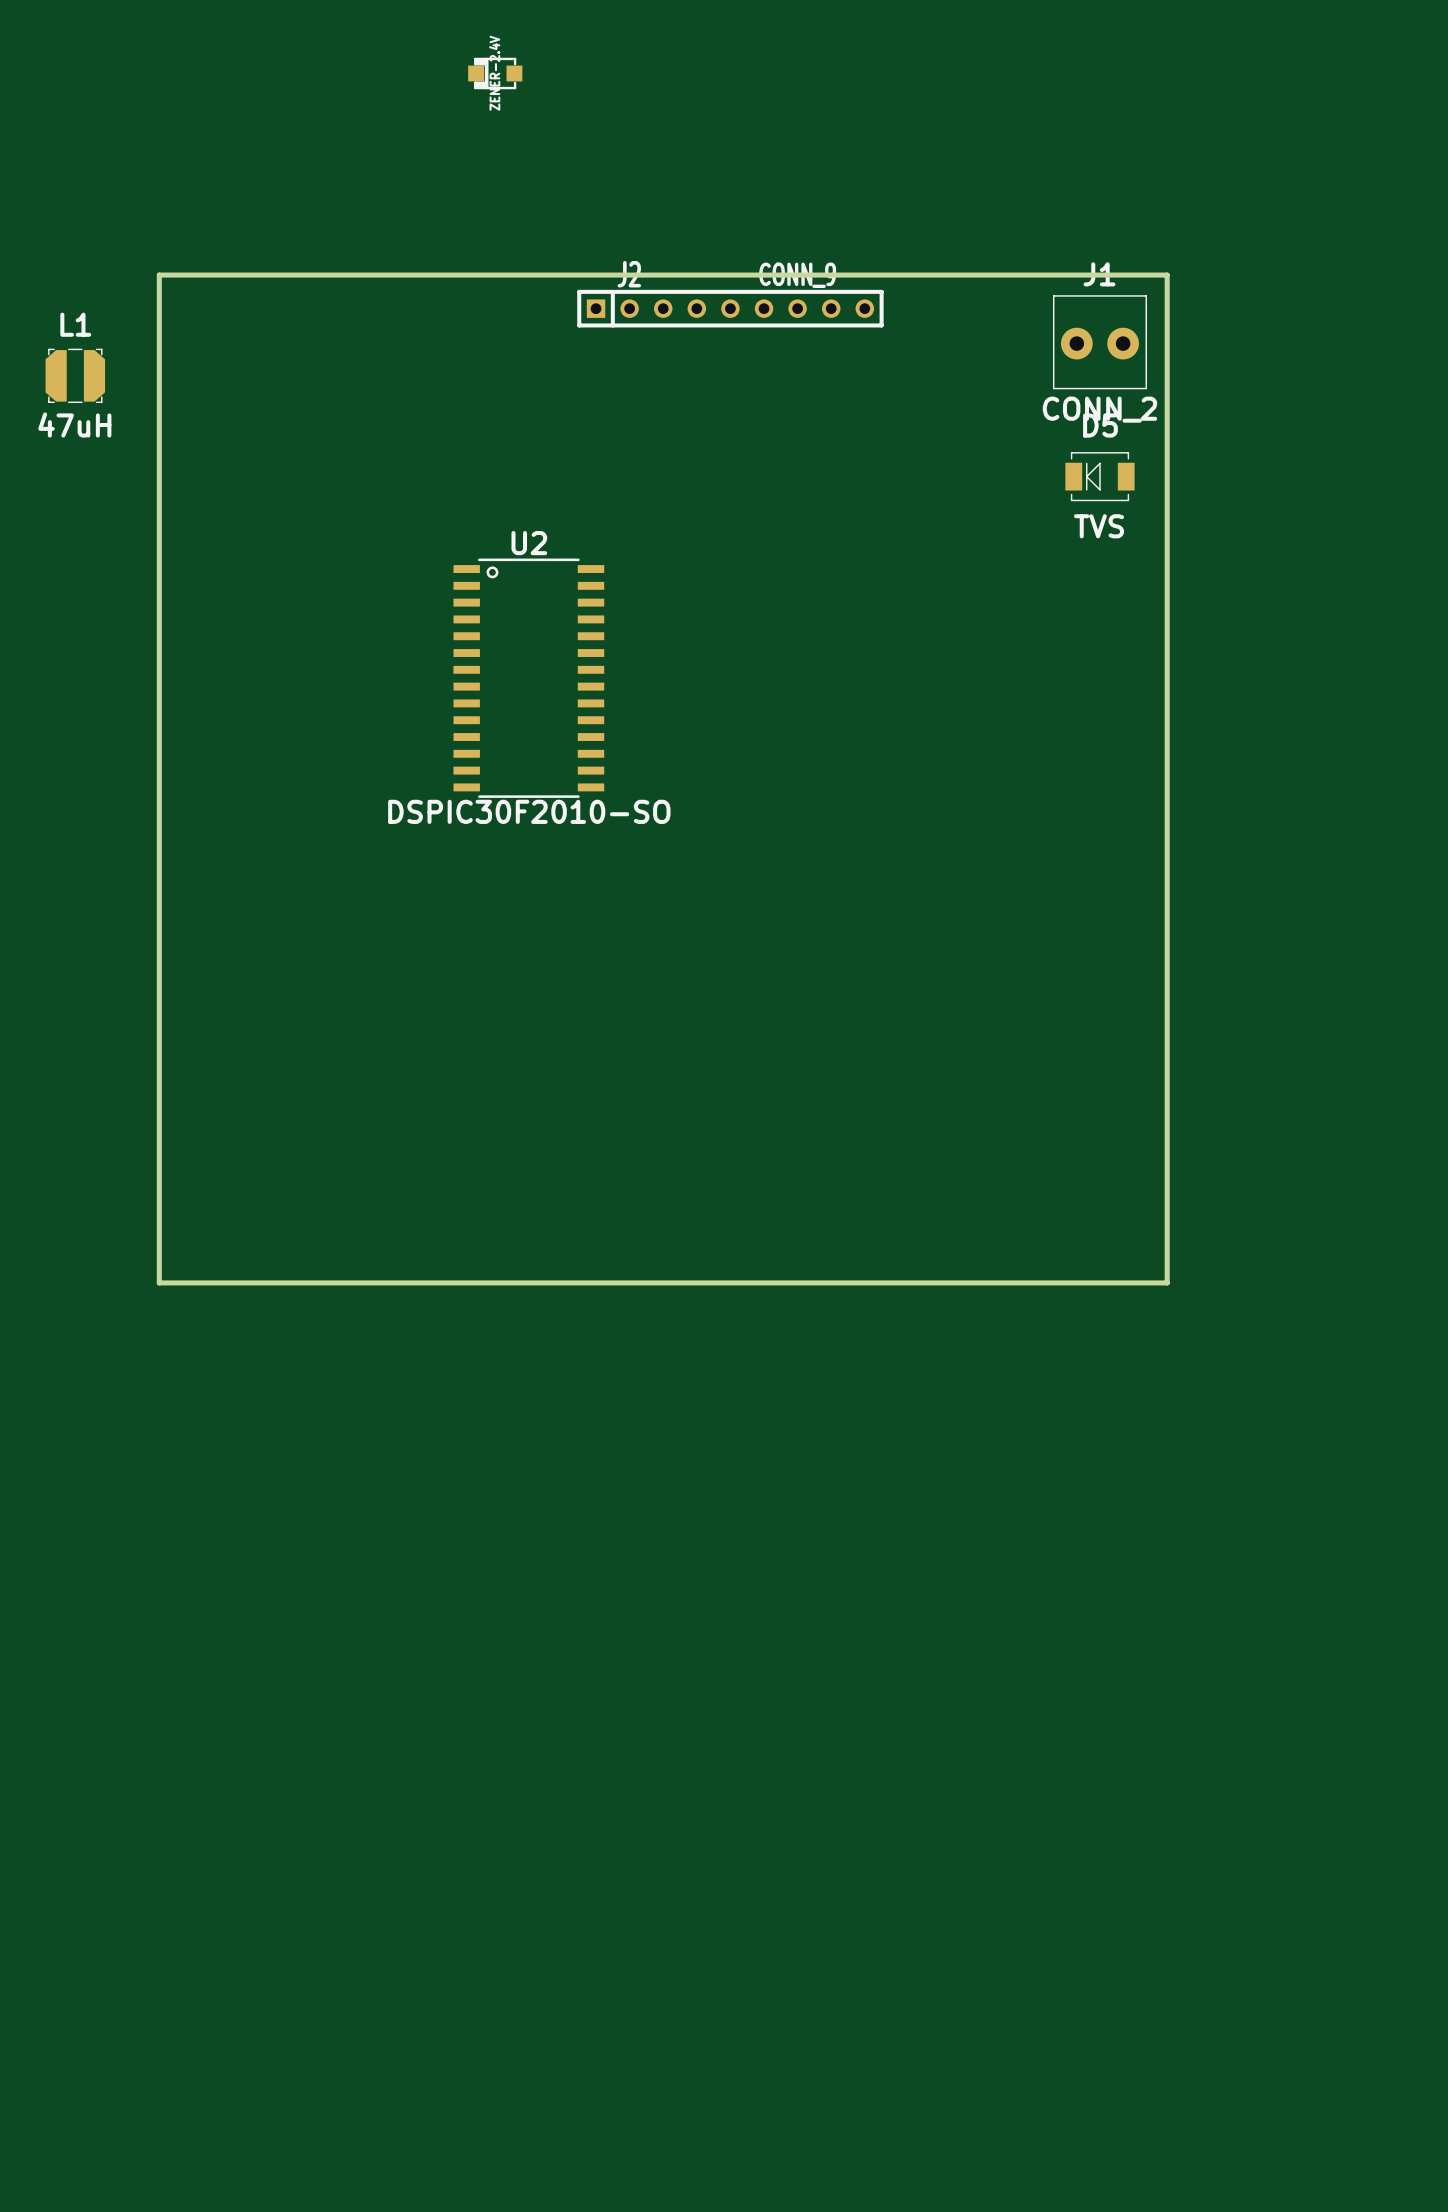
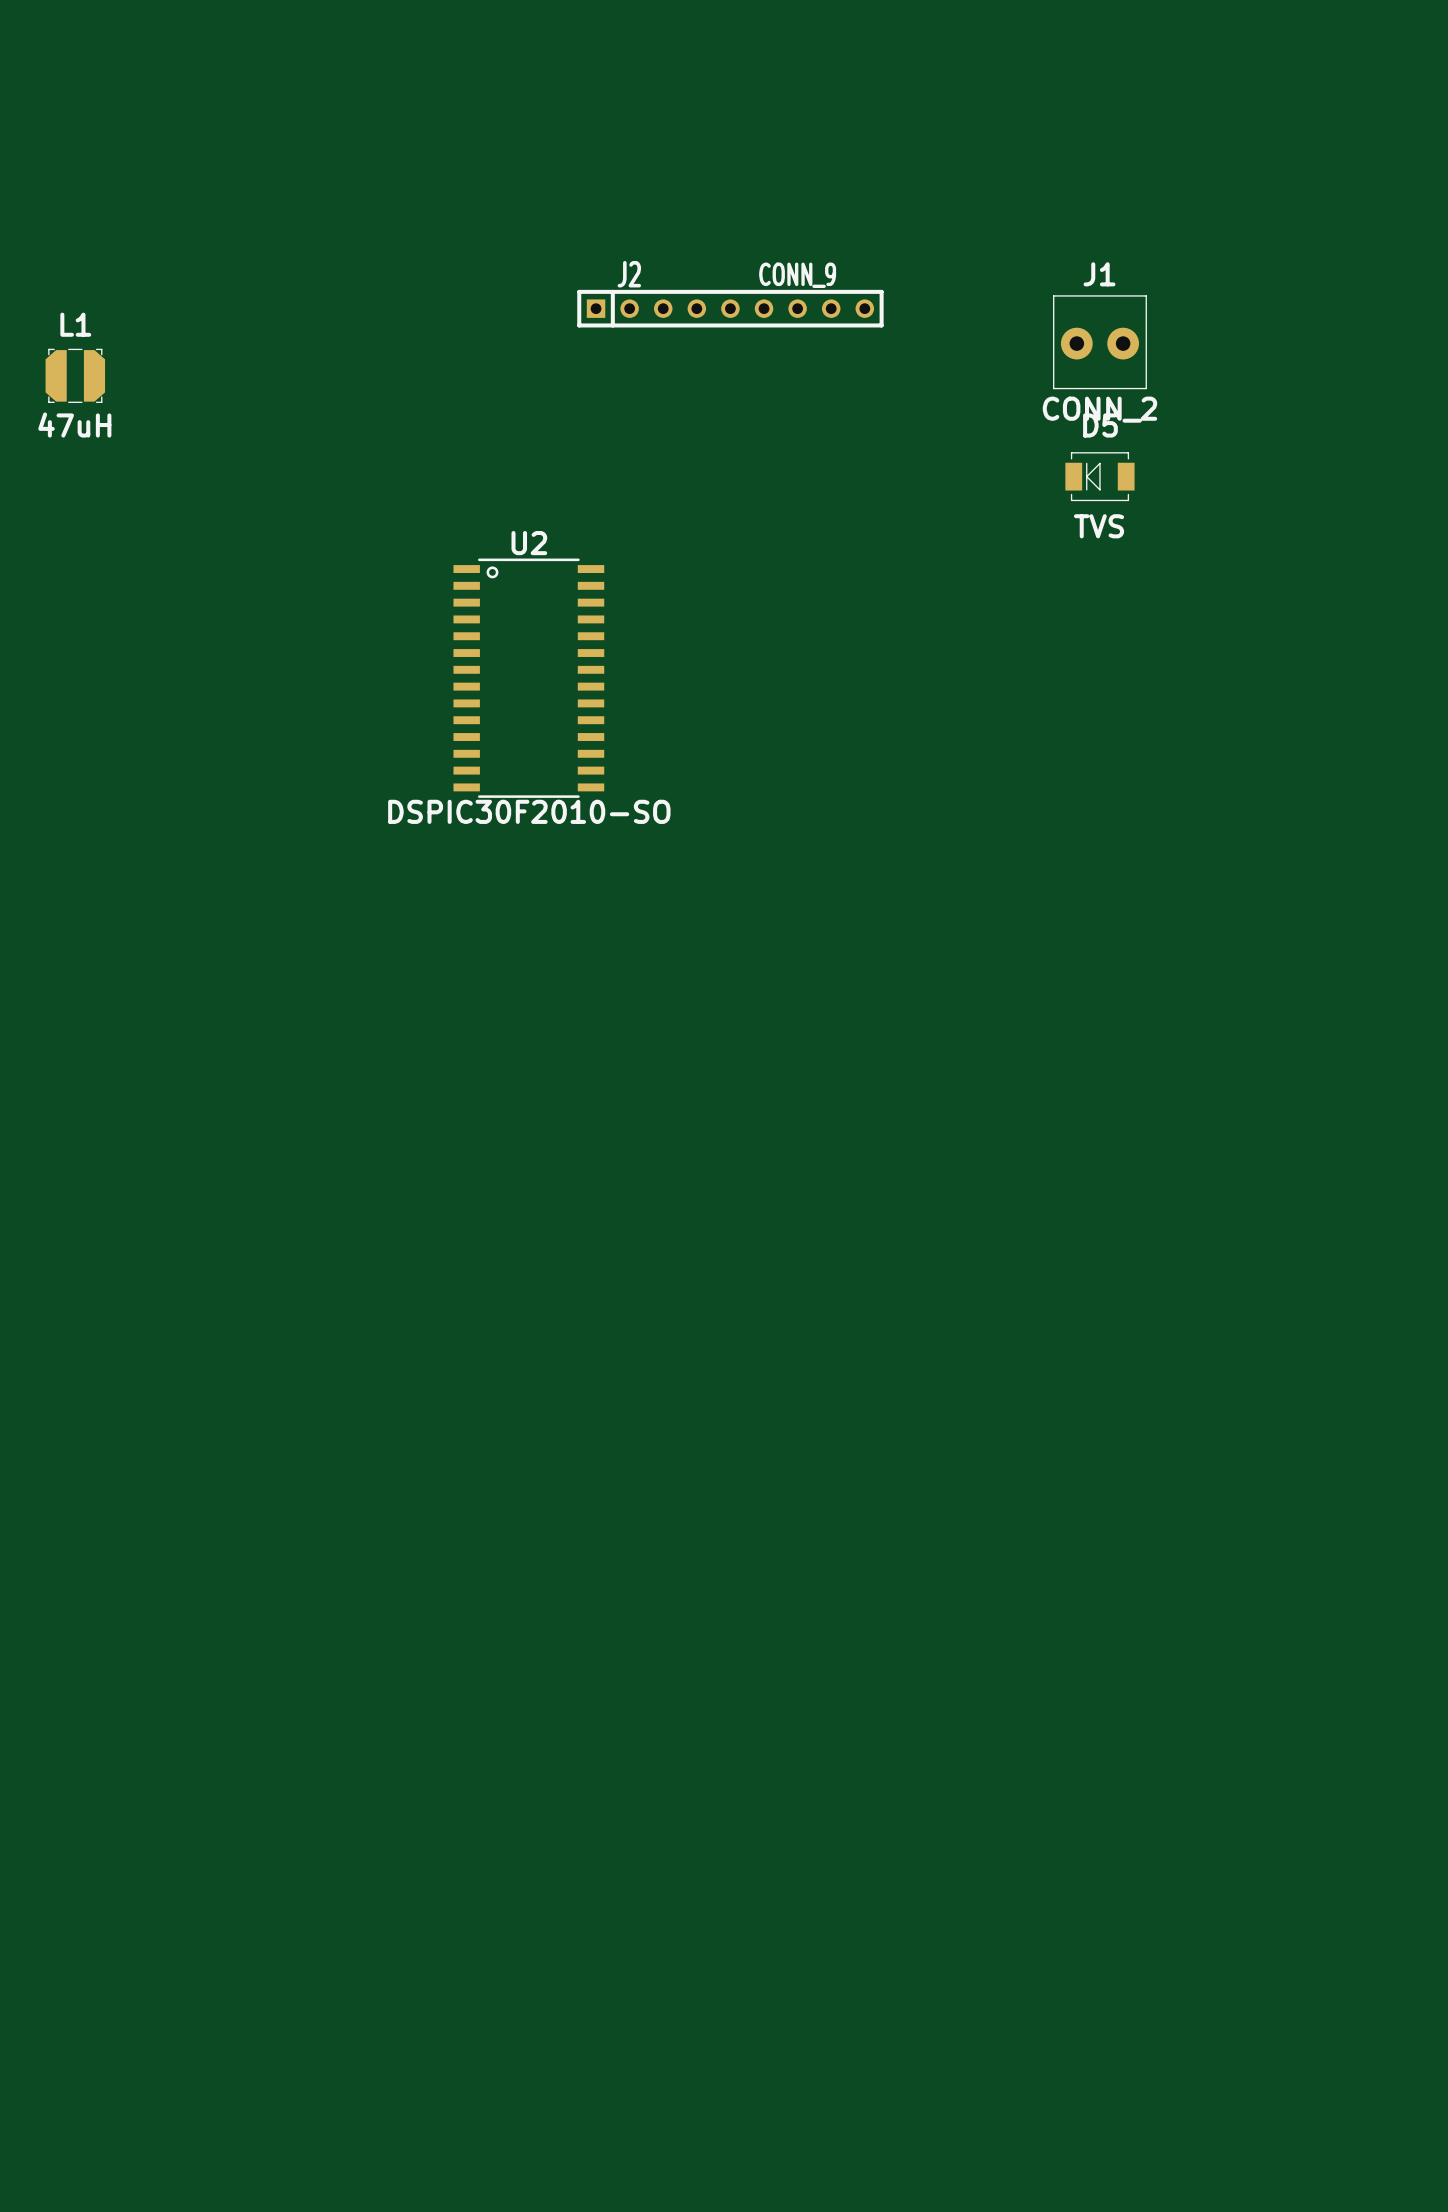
part: ZENER-2.4V (495, 73) -> none
board edge: (159, 275) (1167, 275) (1167, 1282) (159, 1282) (159, 275) -> none

